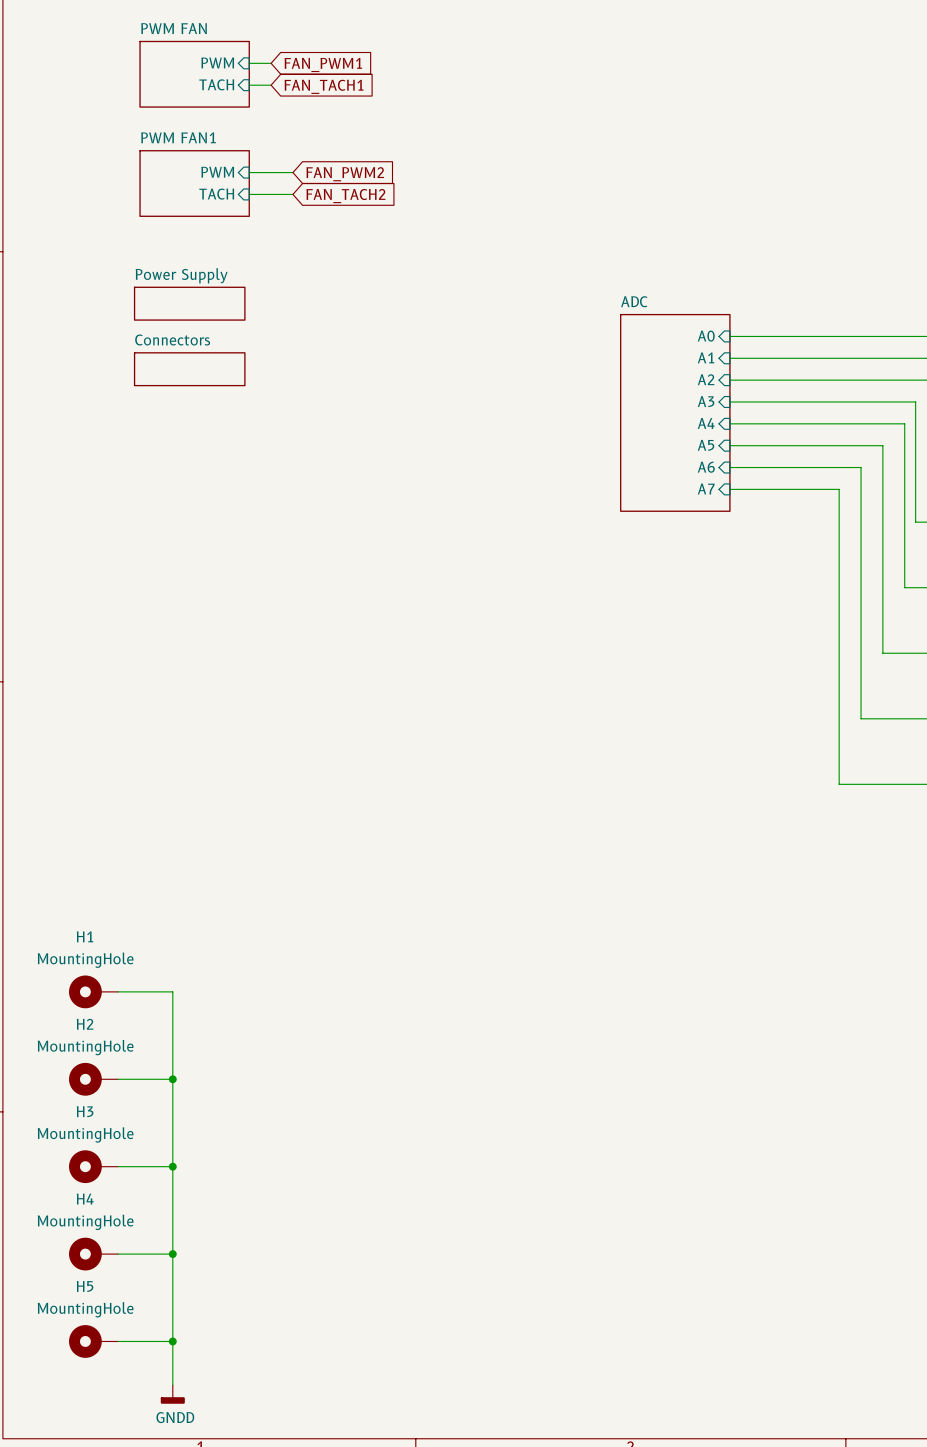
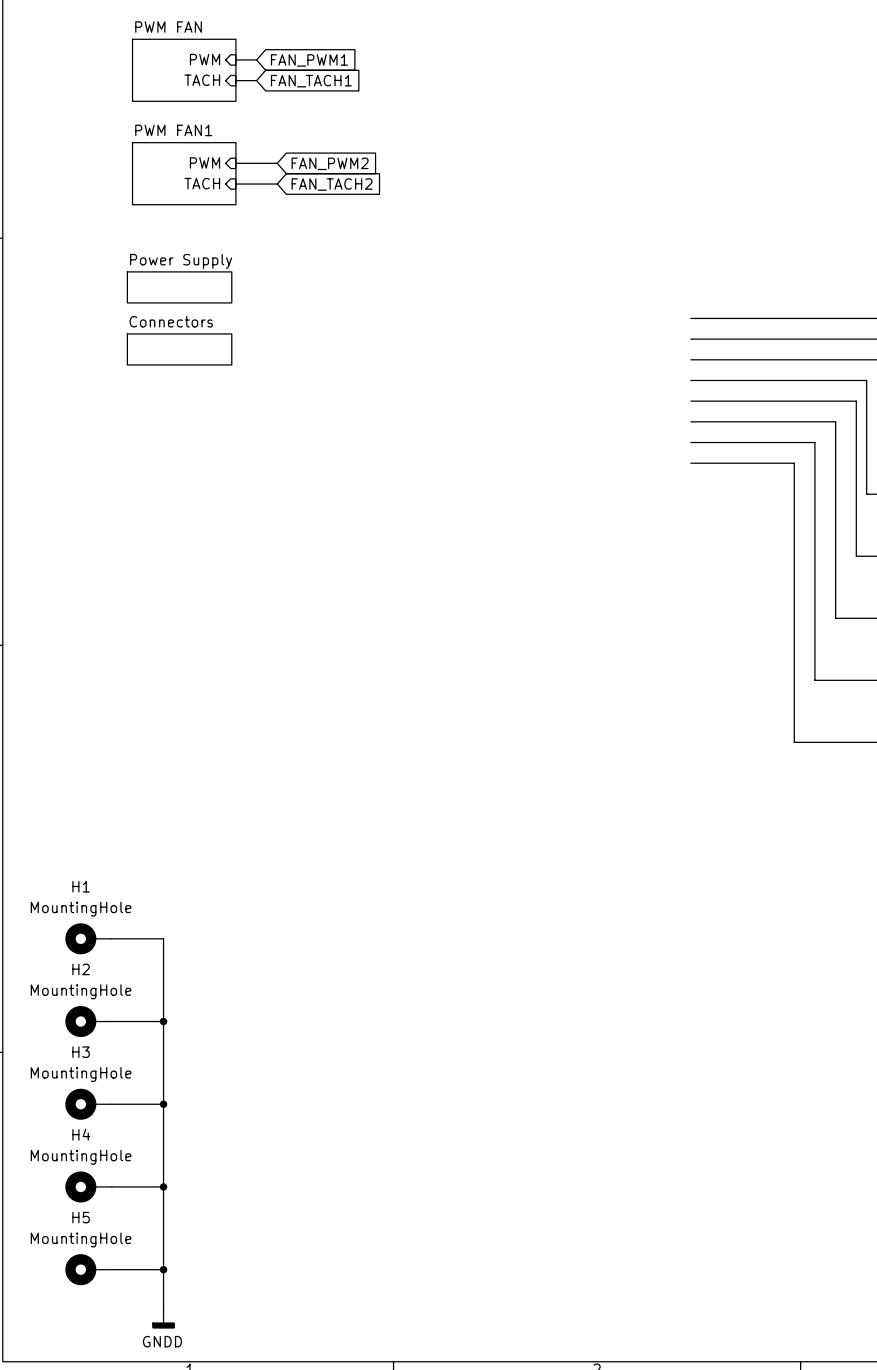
sheet pin: A0 (706, 336) -> none
sheet pin: A1 (706, 357) -> none
sheet pin: A2 (706, 379) -> none
sheet pin: A3 (706, 401) -> none
sheet ADC: (675, 412) -> none
sheet pin: A4 (706, 423) -> none
sheet pin: A5 (706, 445) -> none
sheet pin: A6 (706, 467) -> none
sheet pin: A7 (706, 488) -> none

